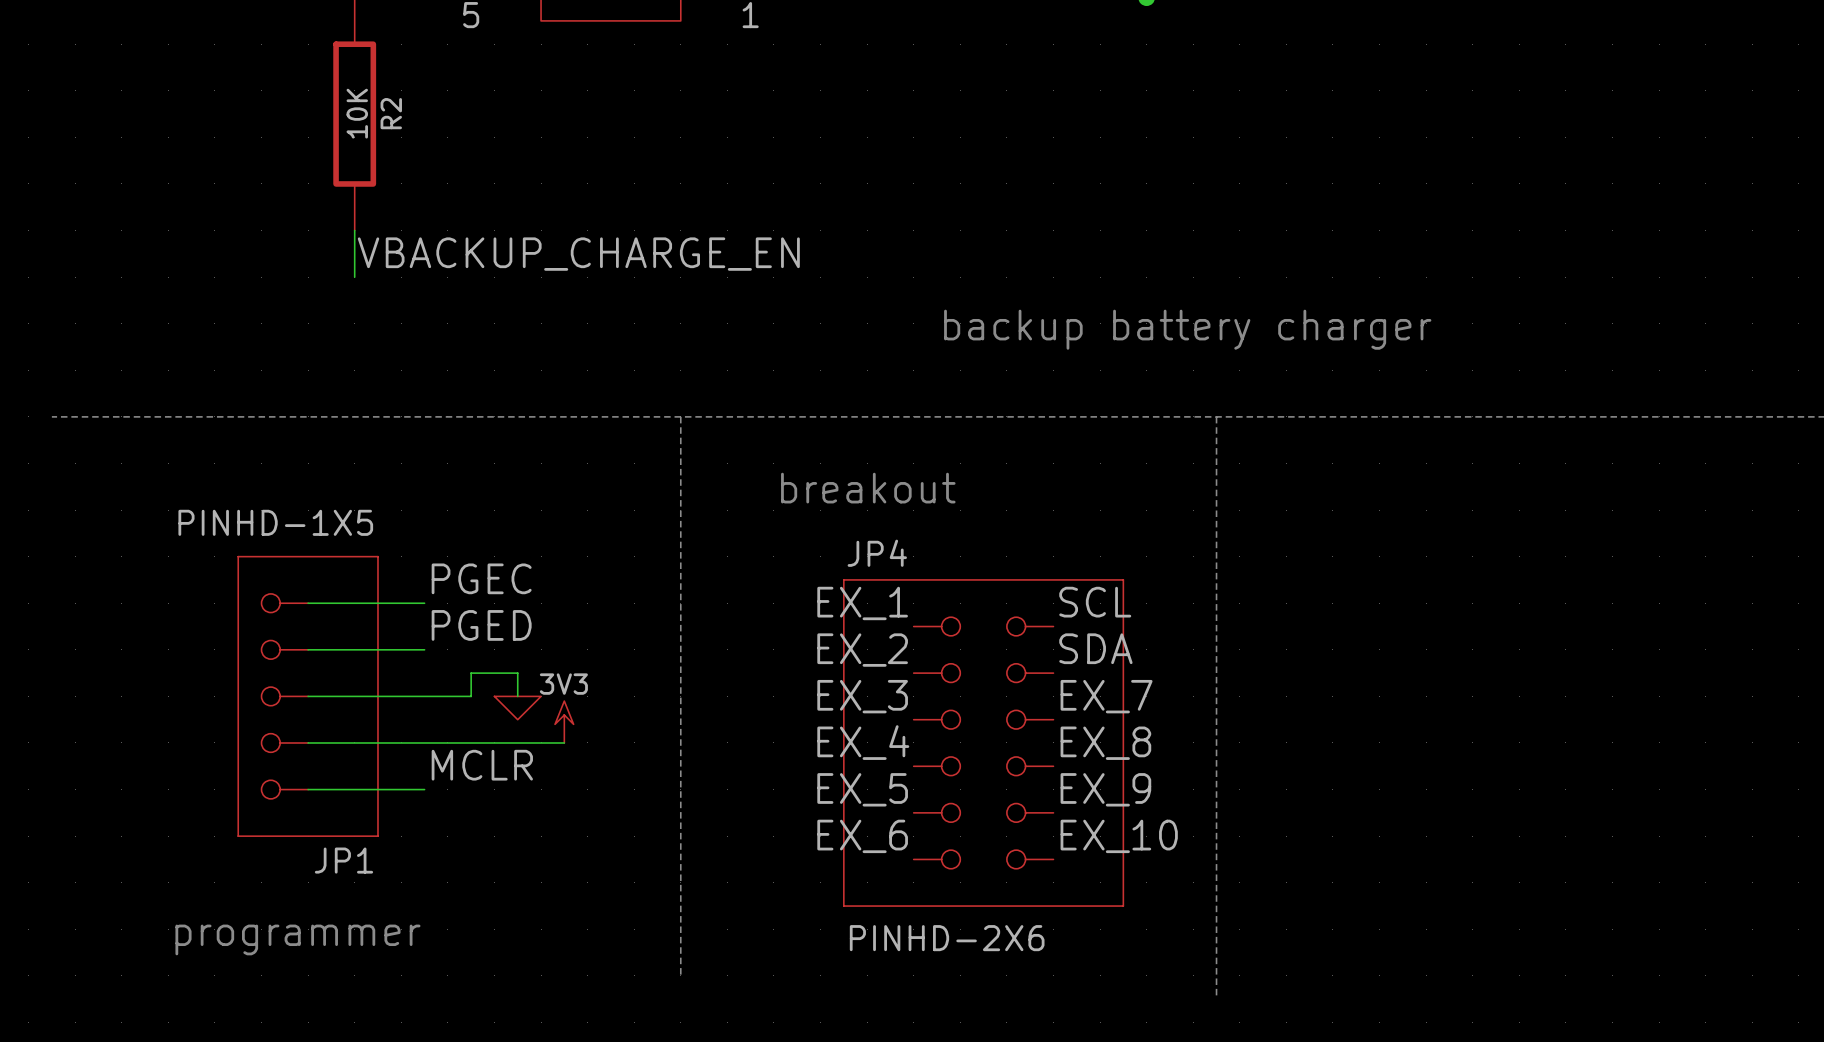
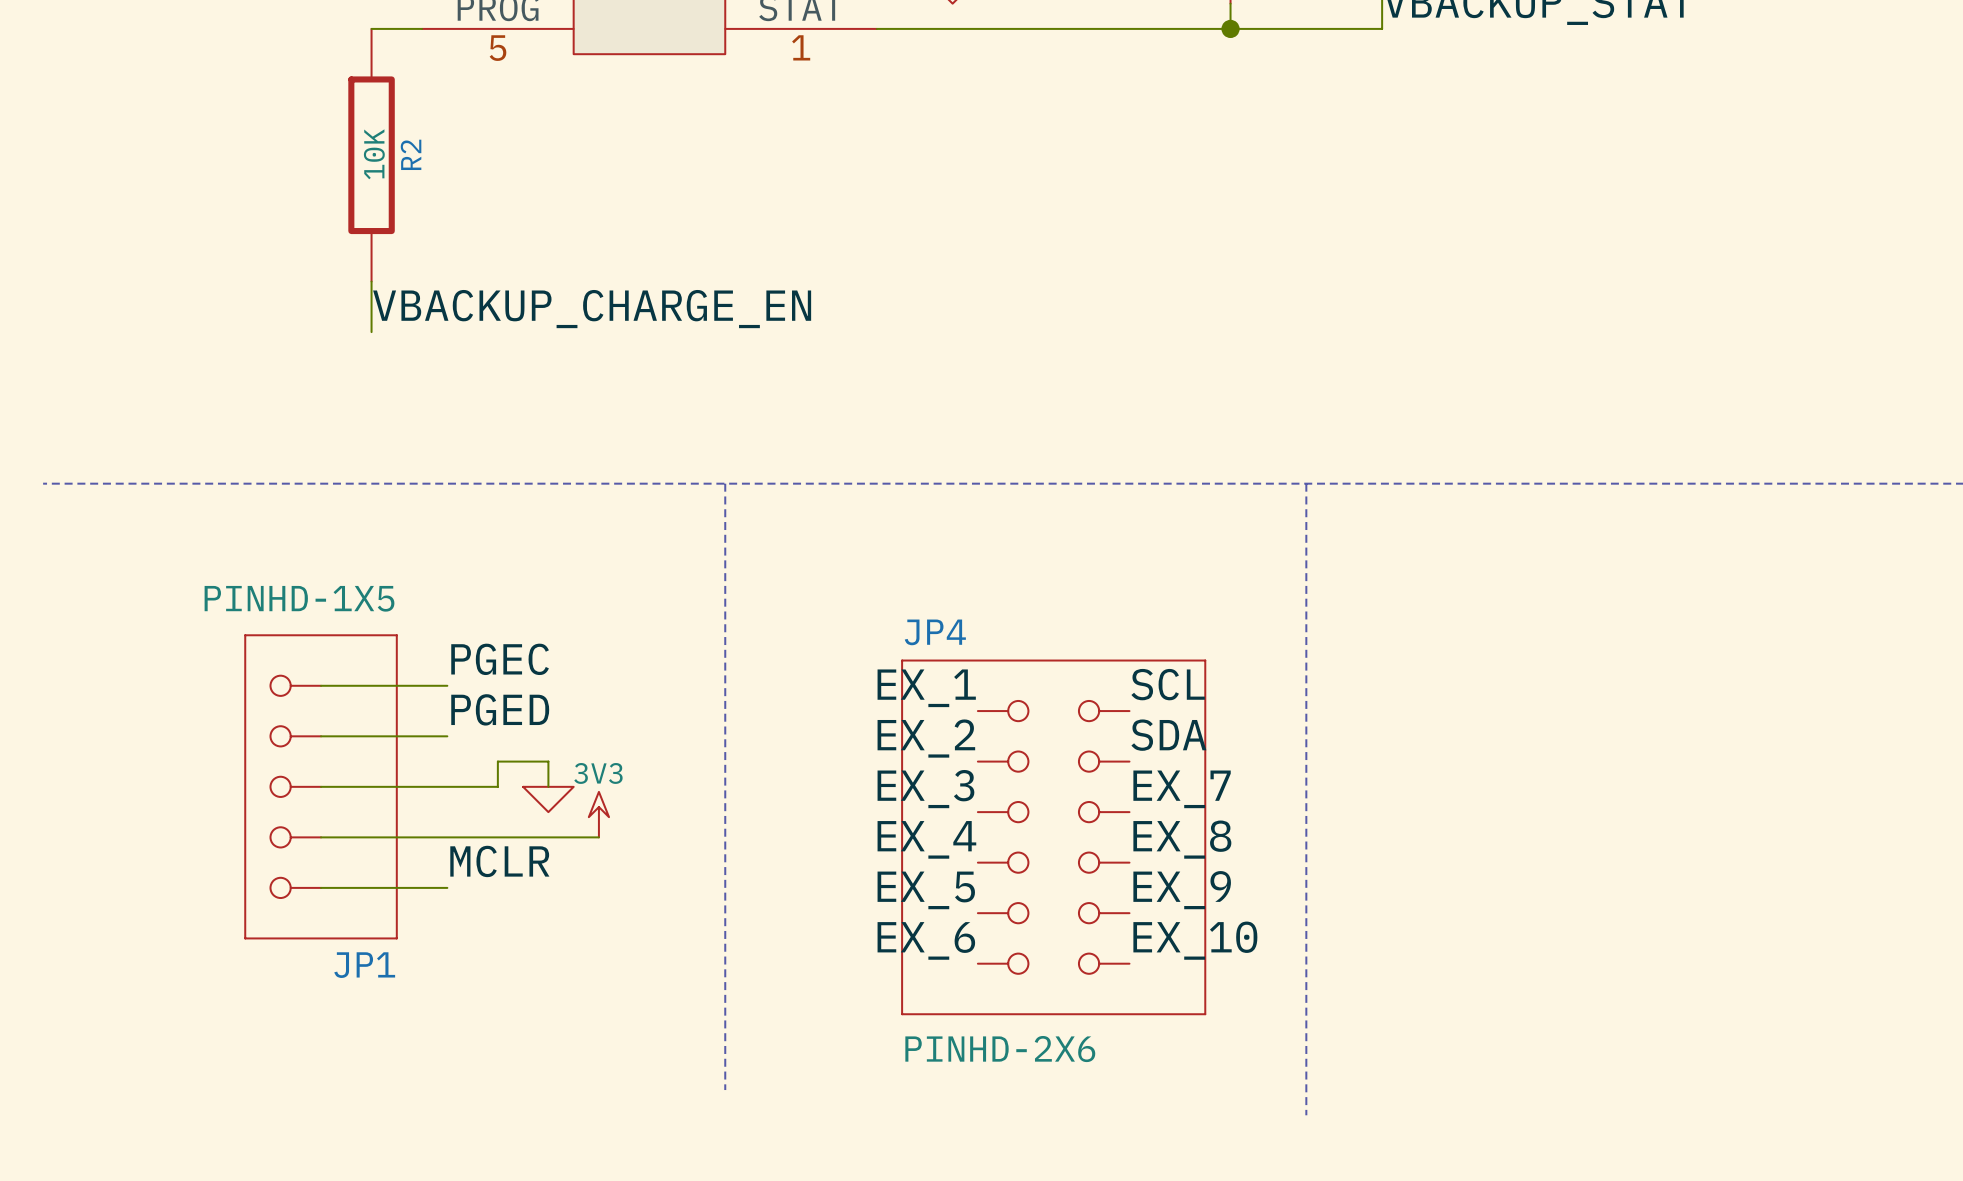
text: backup battery charger (1187, 329) -> none
text: breakout (868, 488) -> none
text: programmer (297, 939) -> none

